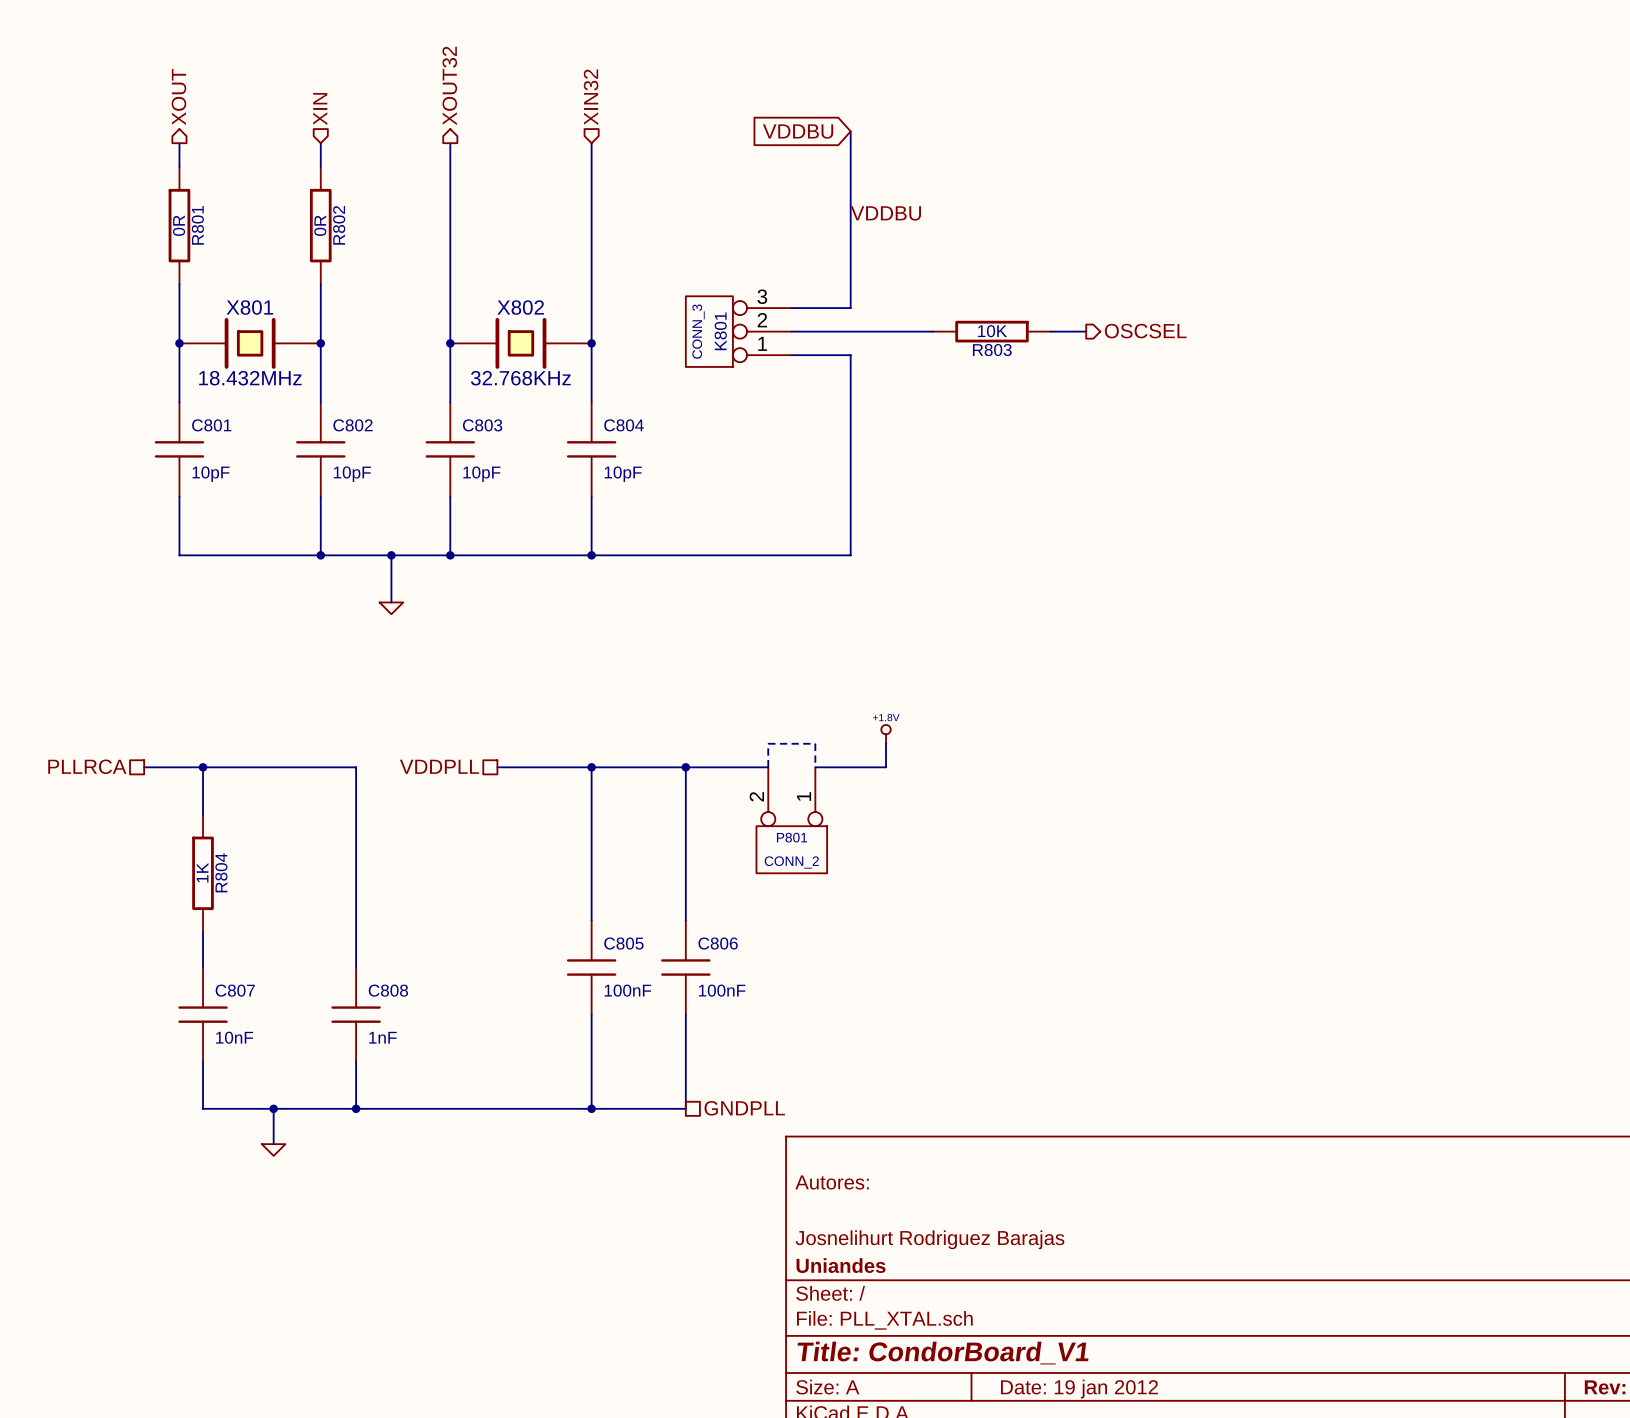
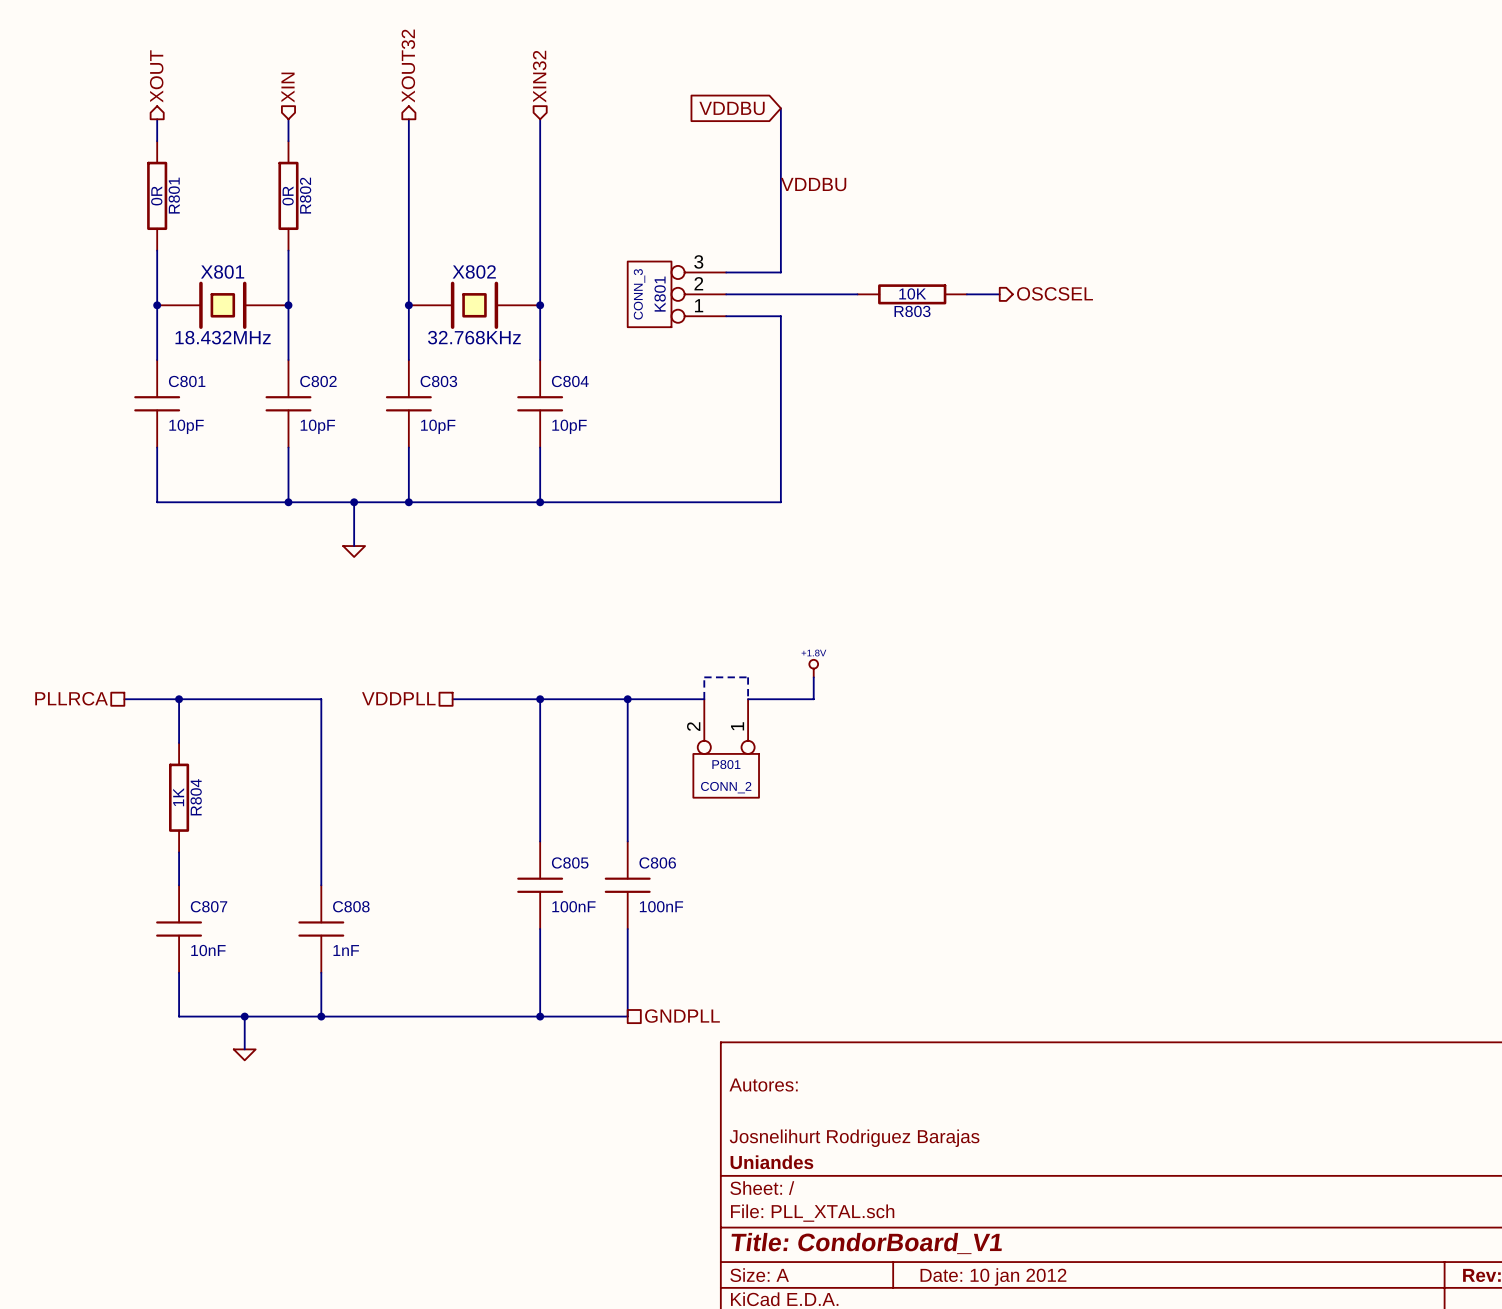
title block: Date: 19 jan 2012 (1079, 1389) -> Date: 10 jan 2012 (993, 1276)

